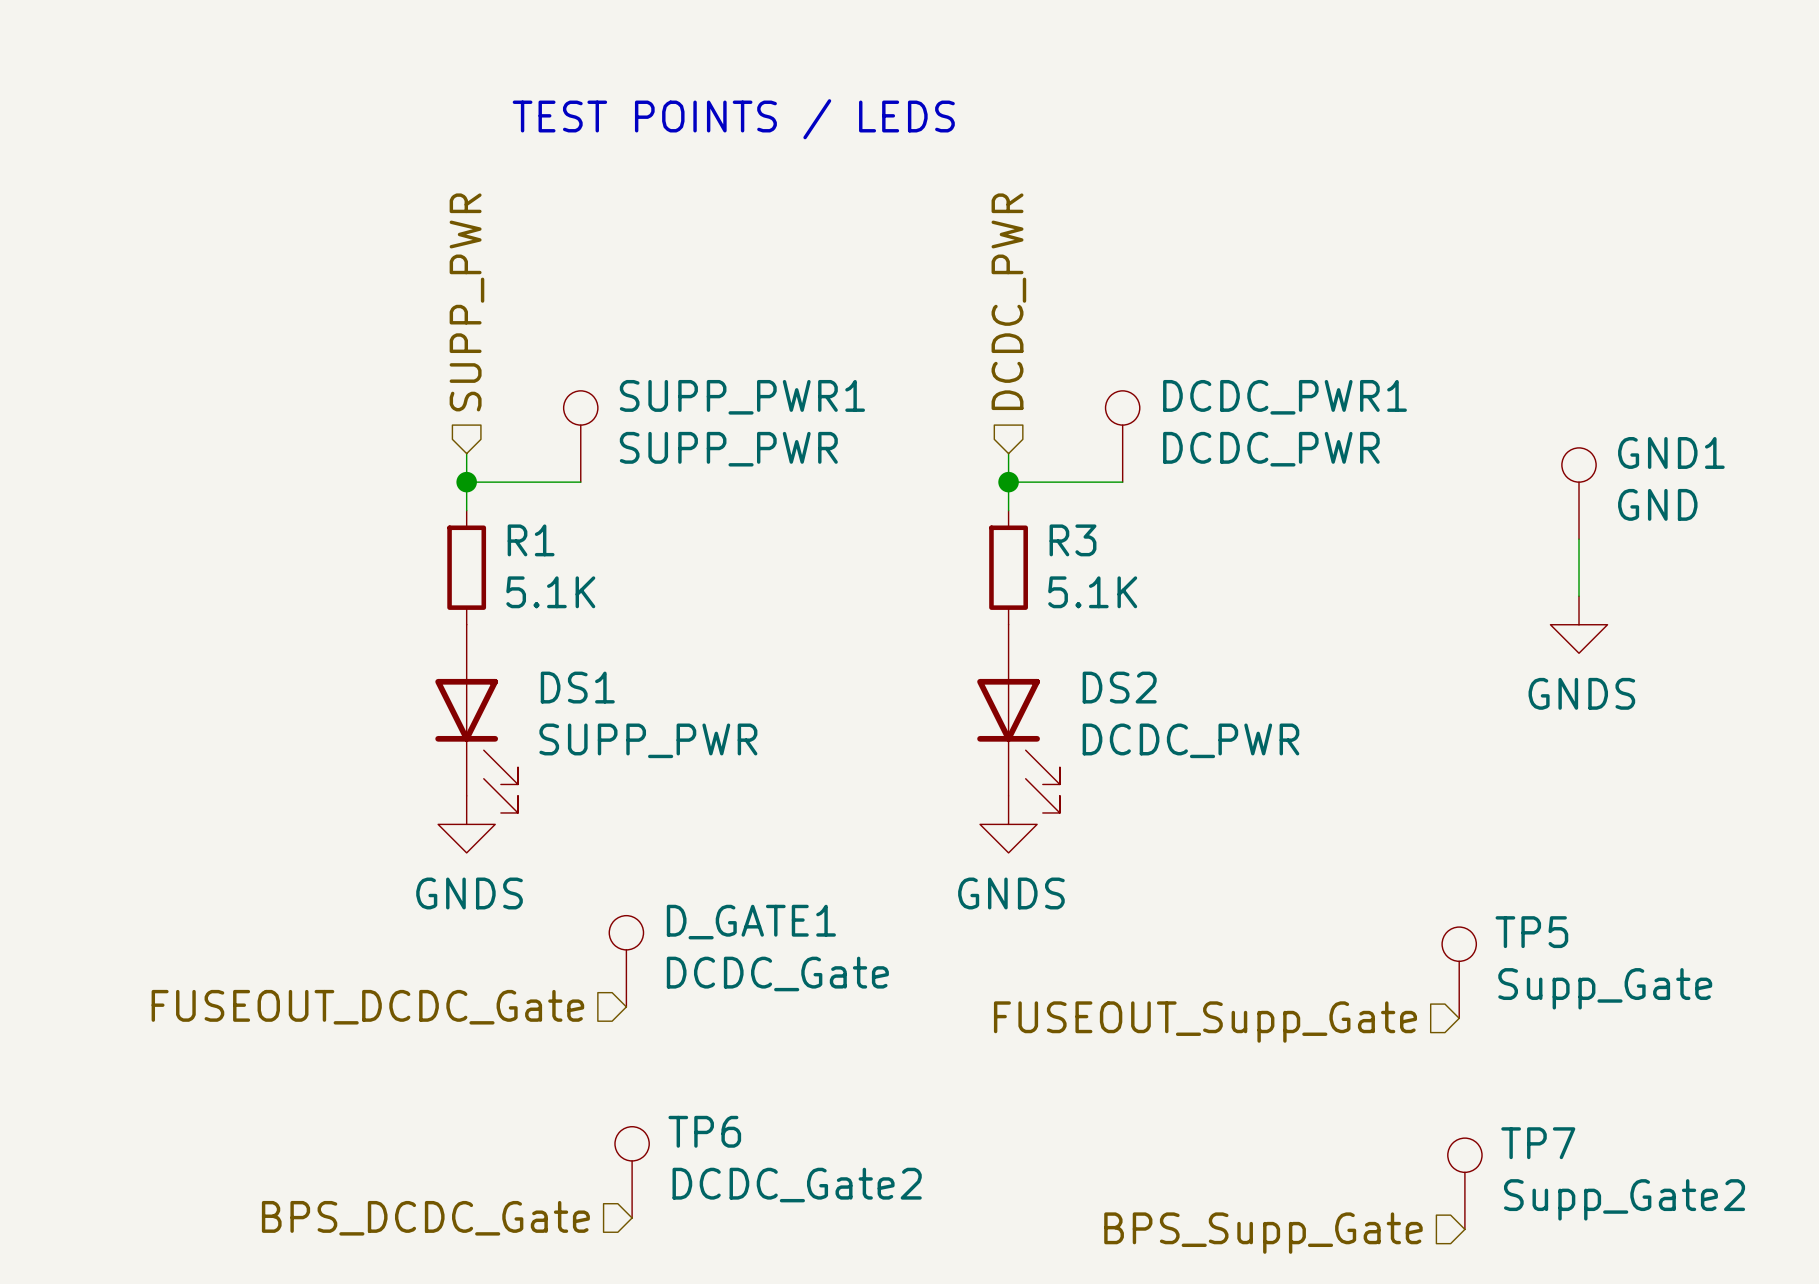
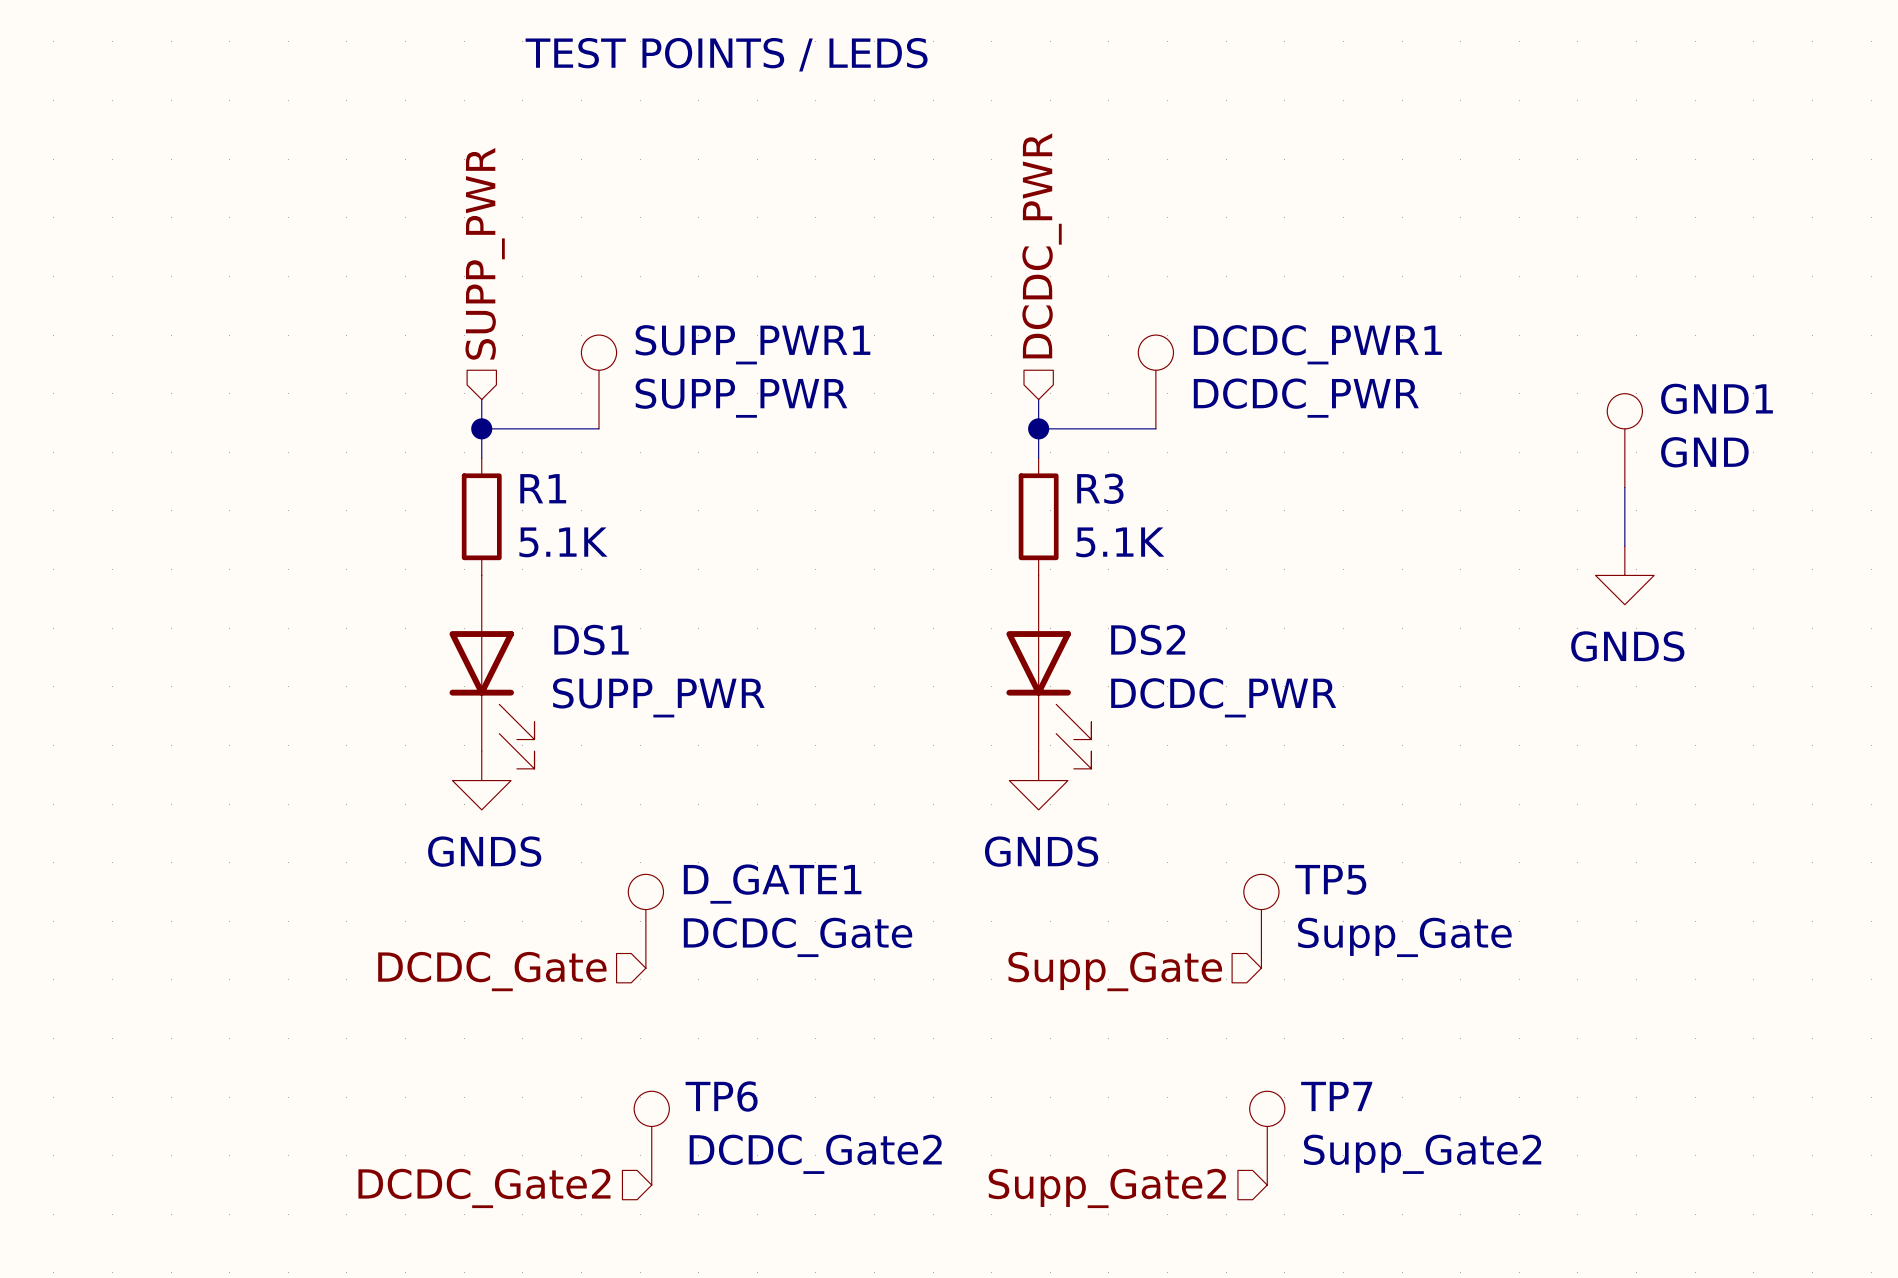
TP5 position: (1459, 972) -> (1261, 921)
hierarchical label: FUSEOUT_DCDC_Gate (367, 1007) -> DCDC_Gate (492, 971)
hierarchical label: FUSEOUT_Supp_Gate (1205, 1022) -> Supp_Gate (1115, 971)
TP7 position: (1464, 1183) -> (1267, 1138)
hierarchical label: BPS_DCDC_Gate (425, 1218) -> DCDC_Gate2 (484, 1188)
hierarchical label: BPS_Supp_Gate (1263, 1233) -> Supp_Gate2 (1107, 1188)

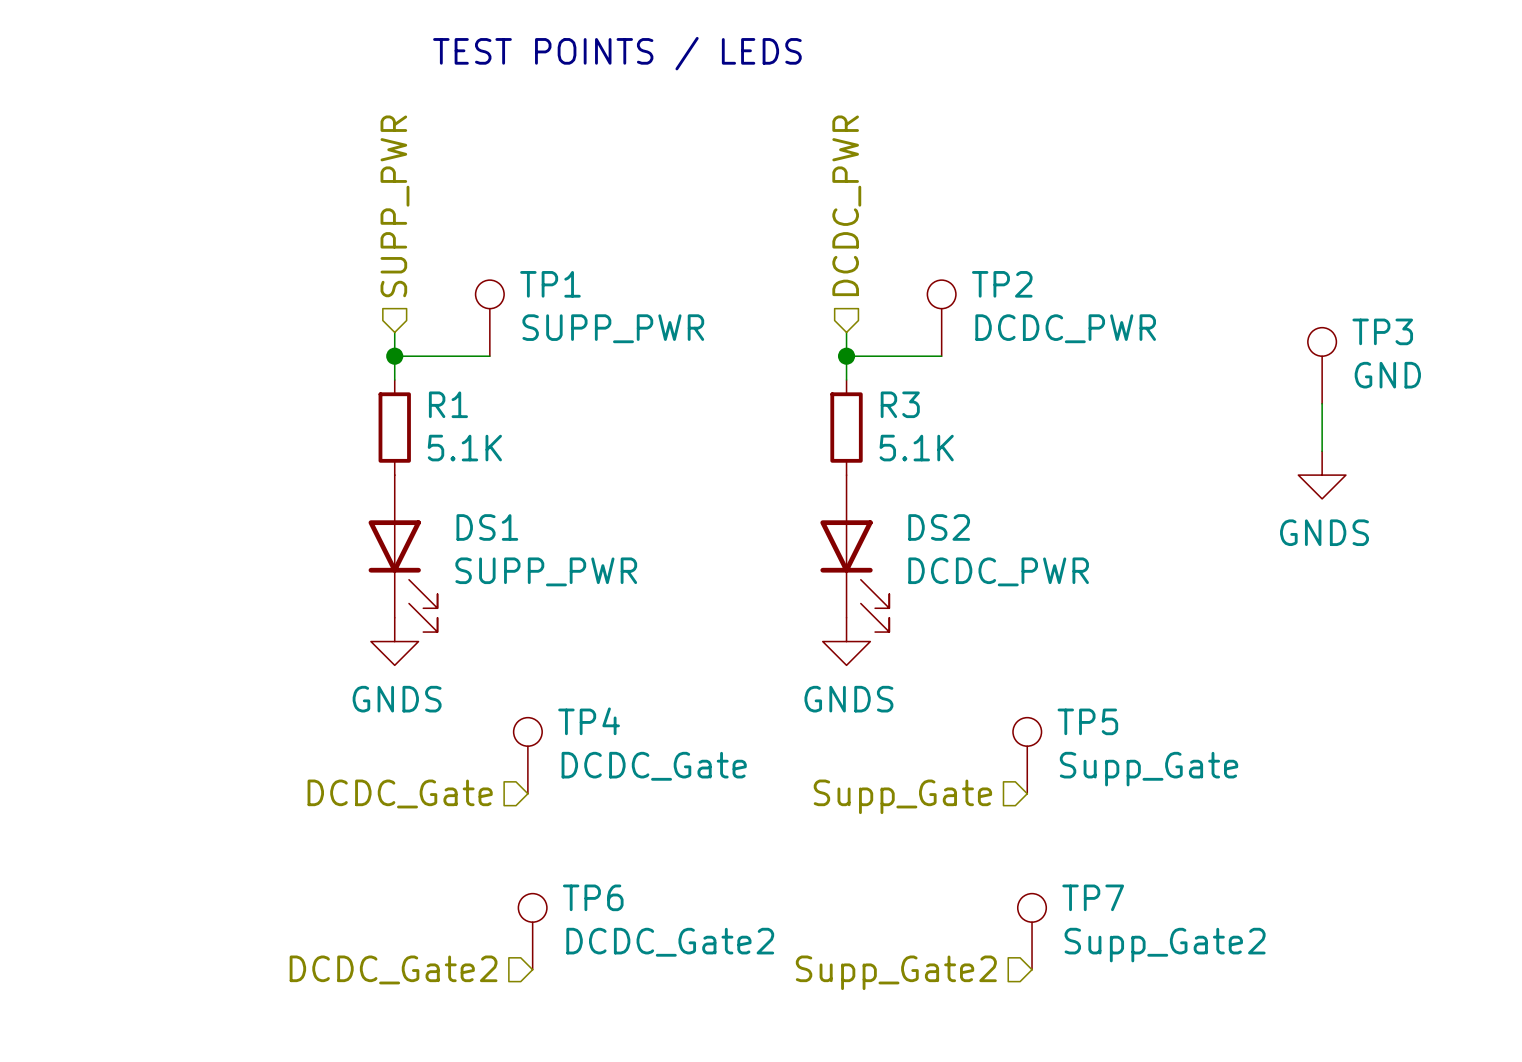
SUPP_PWR1 name: SUPP_PWR1 (752, 344) -> TP1 (550, 284)
DCDC_PWR1 name: DCDC_PWR1 (1317, 344) -> TP2 (1002, 284)
GND1 name: GND1 (1717, 398) -> TP3 (1382, 331)
D_GATE1 name: D_GATE1 (772, 884) -> TP4 (589, 721)

